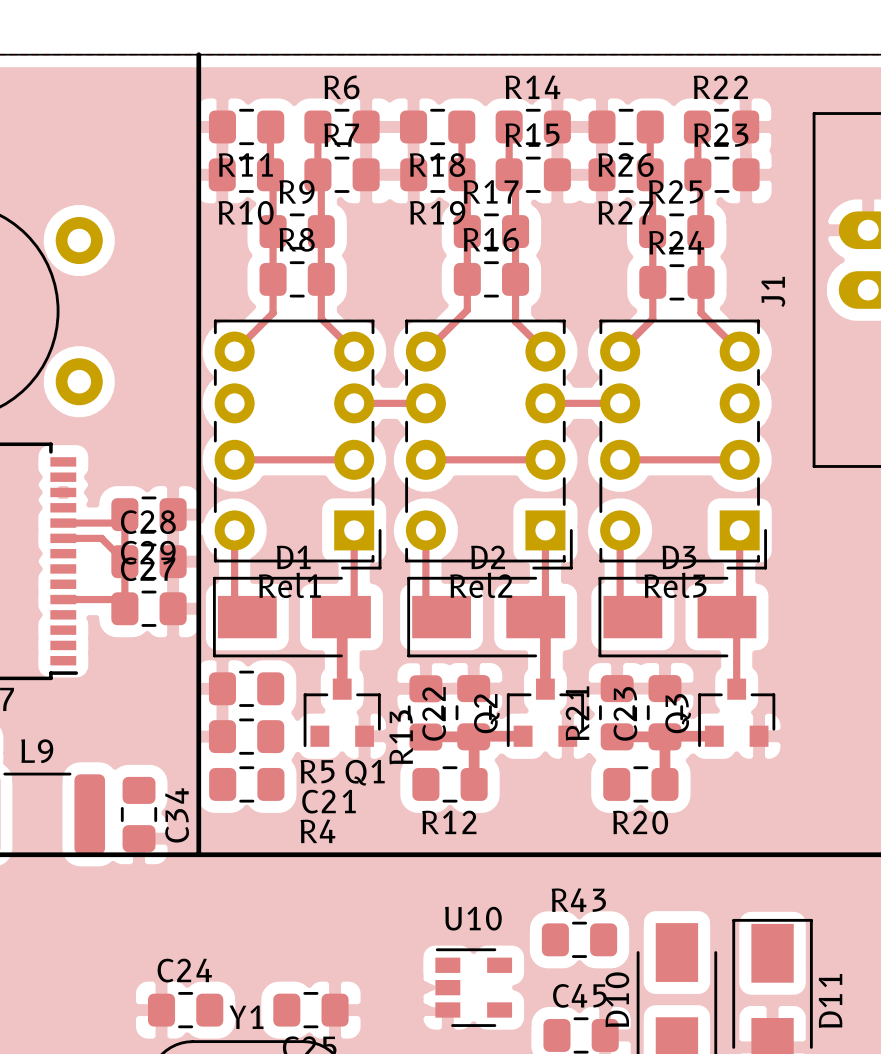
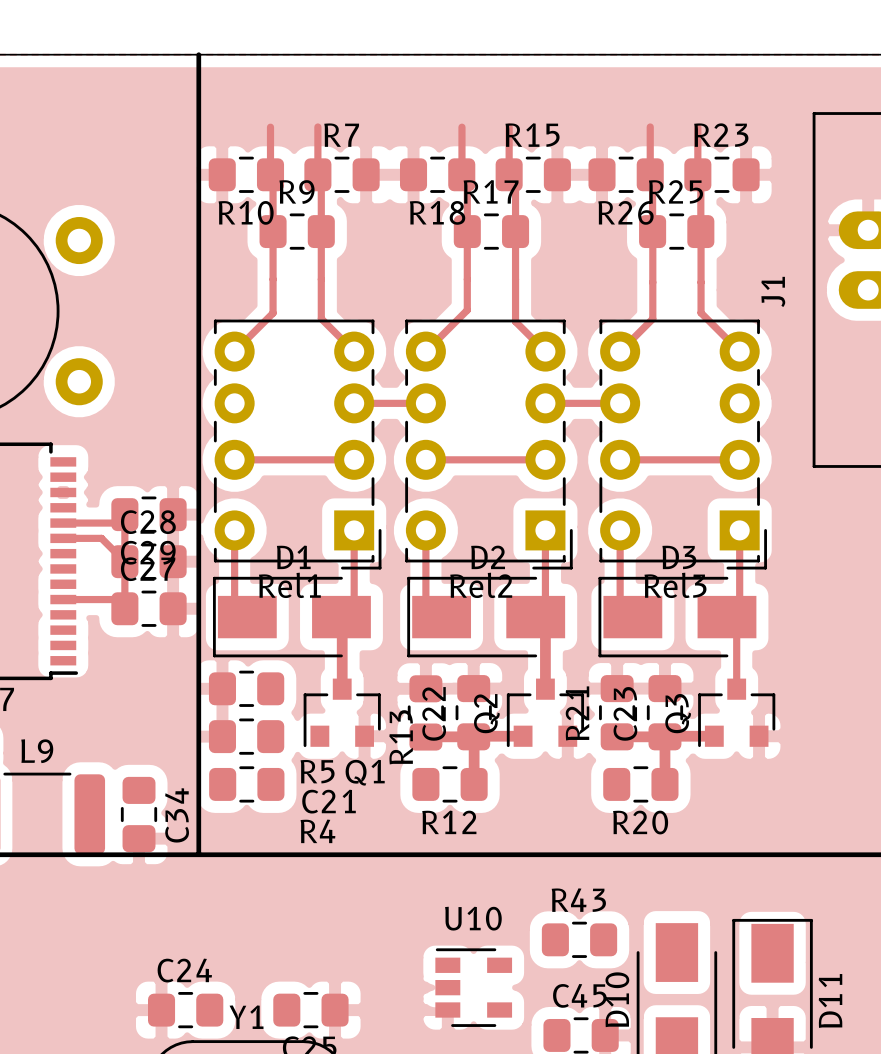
R11: (246, 126) -> none
R6: (342, 126) -> none
R18: (437, 126) -> none
R14: (533, 126) -> none
R26: (626, 126) -> none
R22: (721, 126) -> none
R19 name: R19 (437, 212) -> R18 (437, 212)
R27 name: R27 (625, 212) -> R26 (625, 212)
R8: (297, 279) -> none
R16: (491, 279) -> none
R24: (676, 282) -> none

